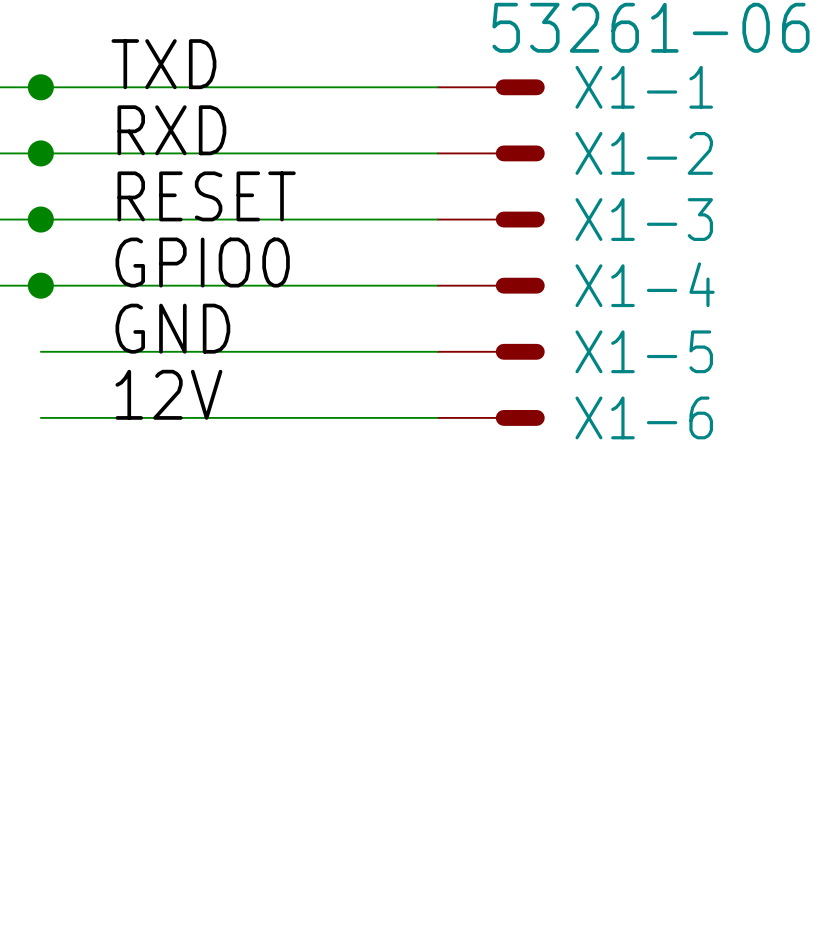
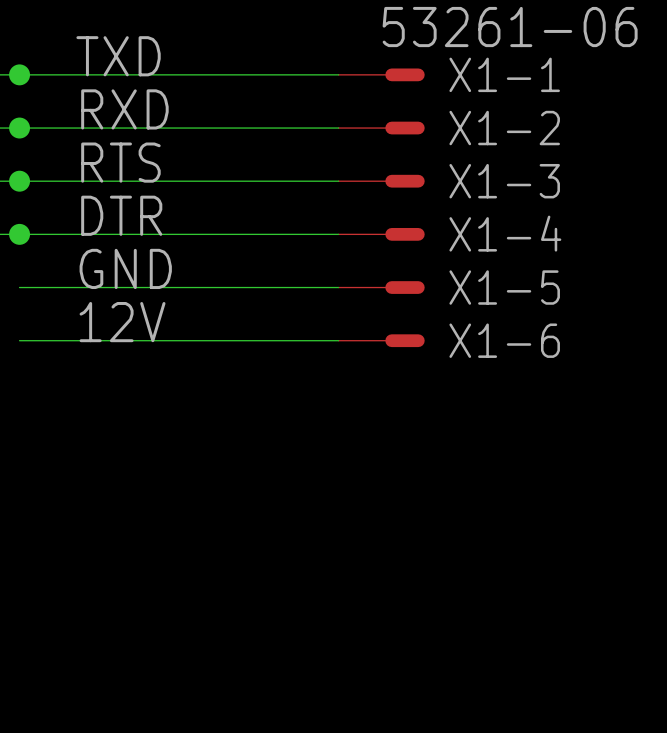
label: RESET (206, 196) -> RTS (120, 162)
label: GPIO0 (202, 262) -> DTR (121, 215)

